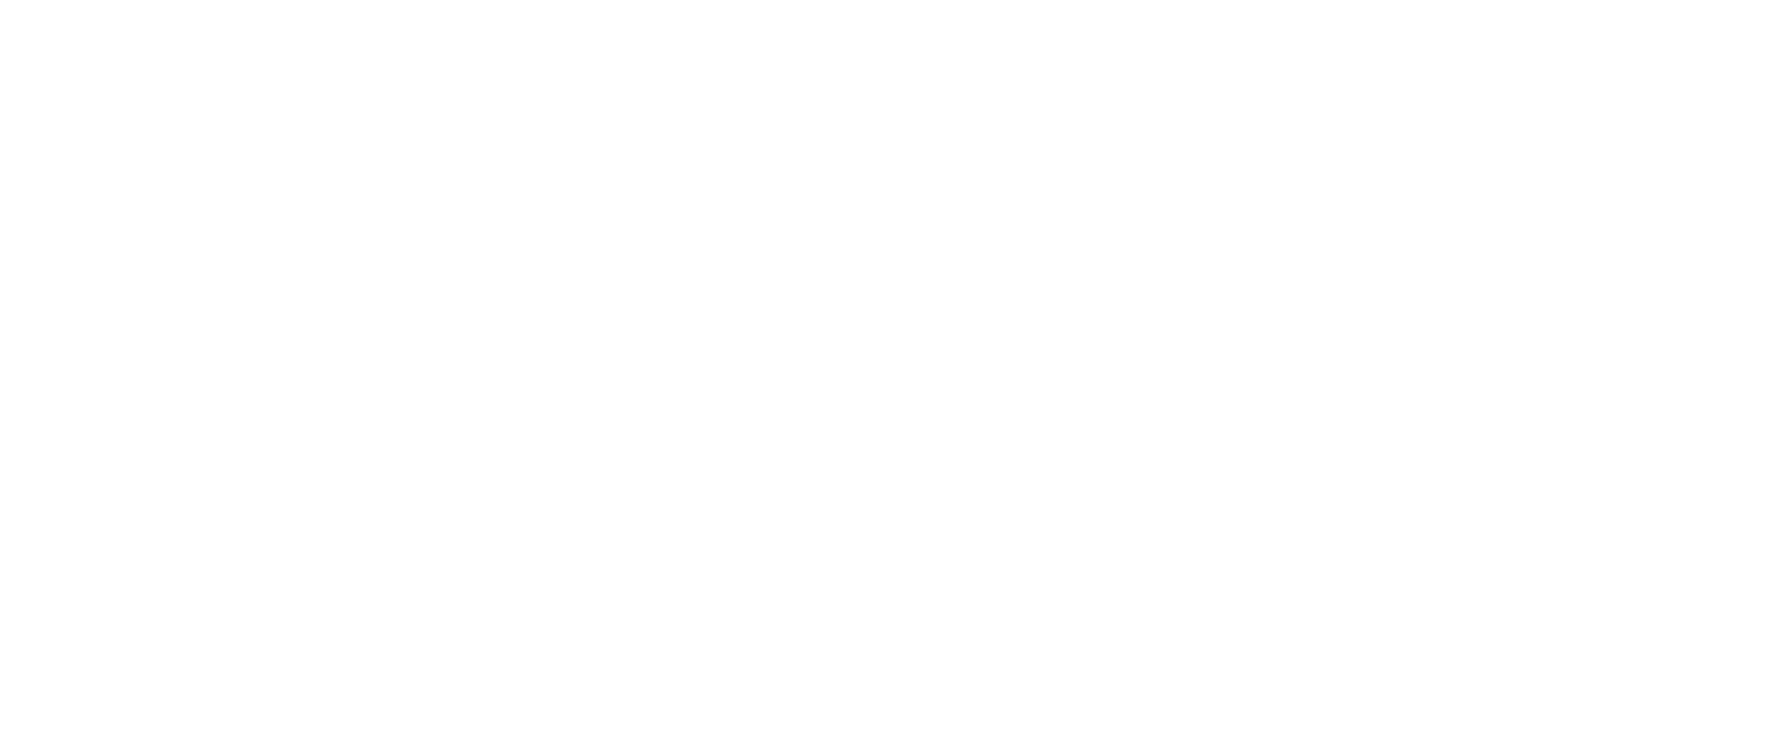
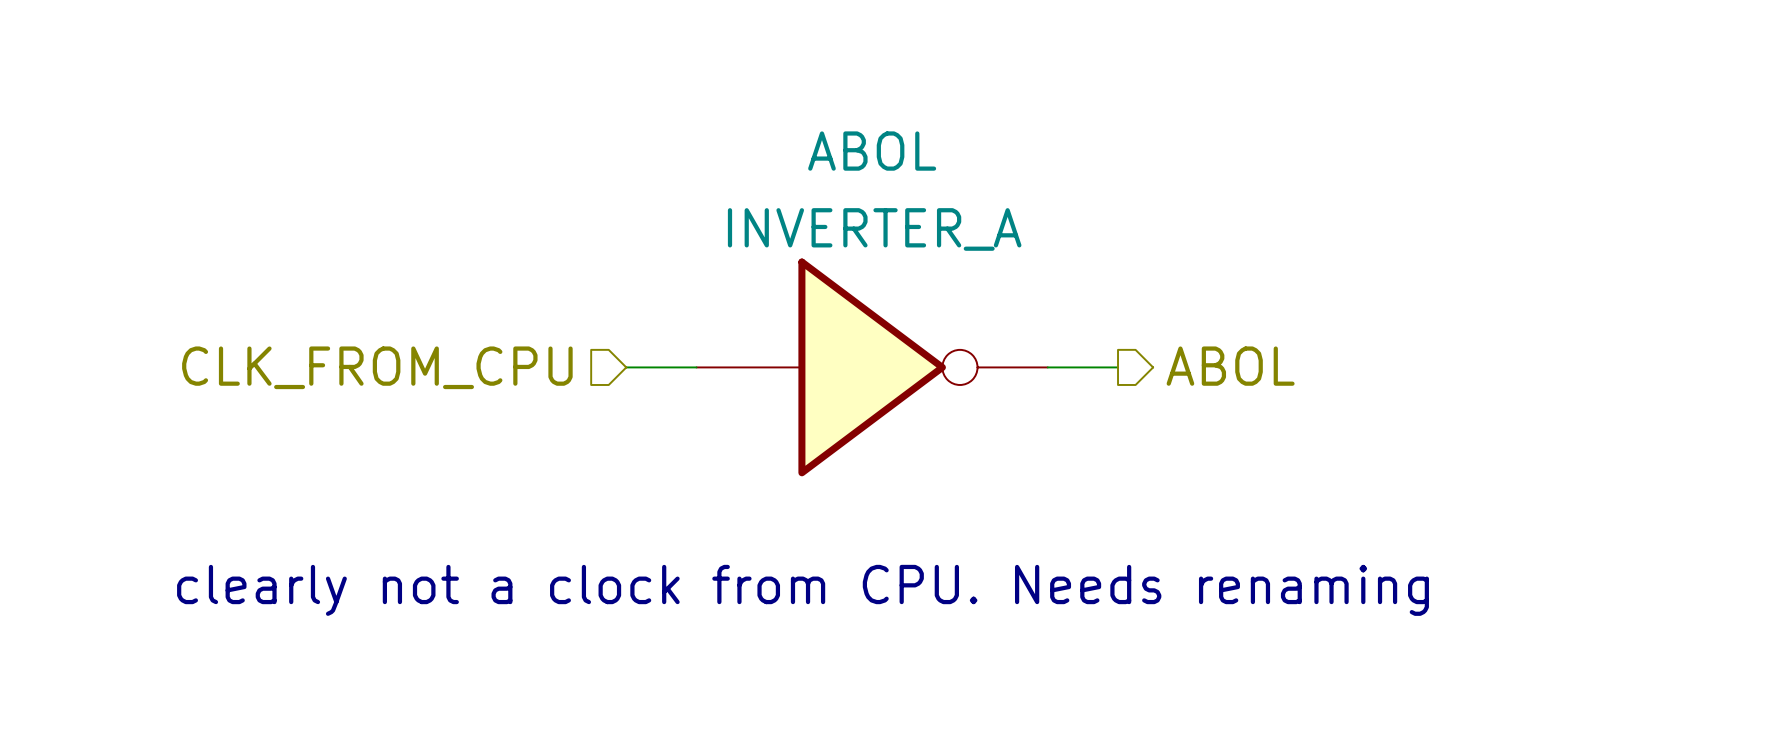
hierarchical label: none -> ABOL (1230, 366)
hierarchical label: none -> CLK_FROM_CPU (377, 367)
wire: none -> (626, 367) (696, 367)
ABOL: none -> INVERTER_A (872, 367)
wire: none -> (1047, 367) (1118, 367)
text: none -> clearly not a clock from CPU. Needs renaming (803, 590)

